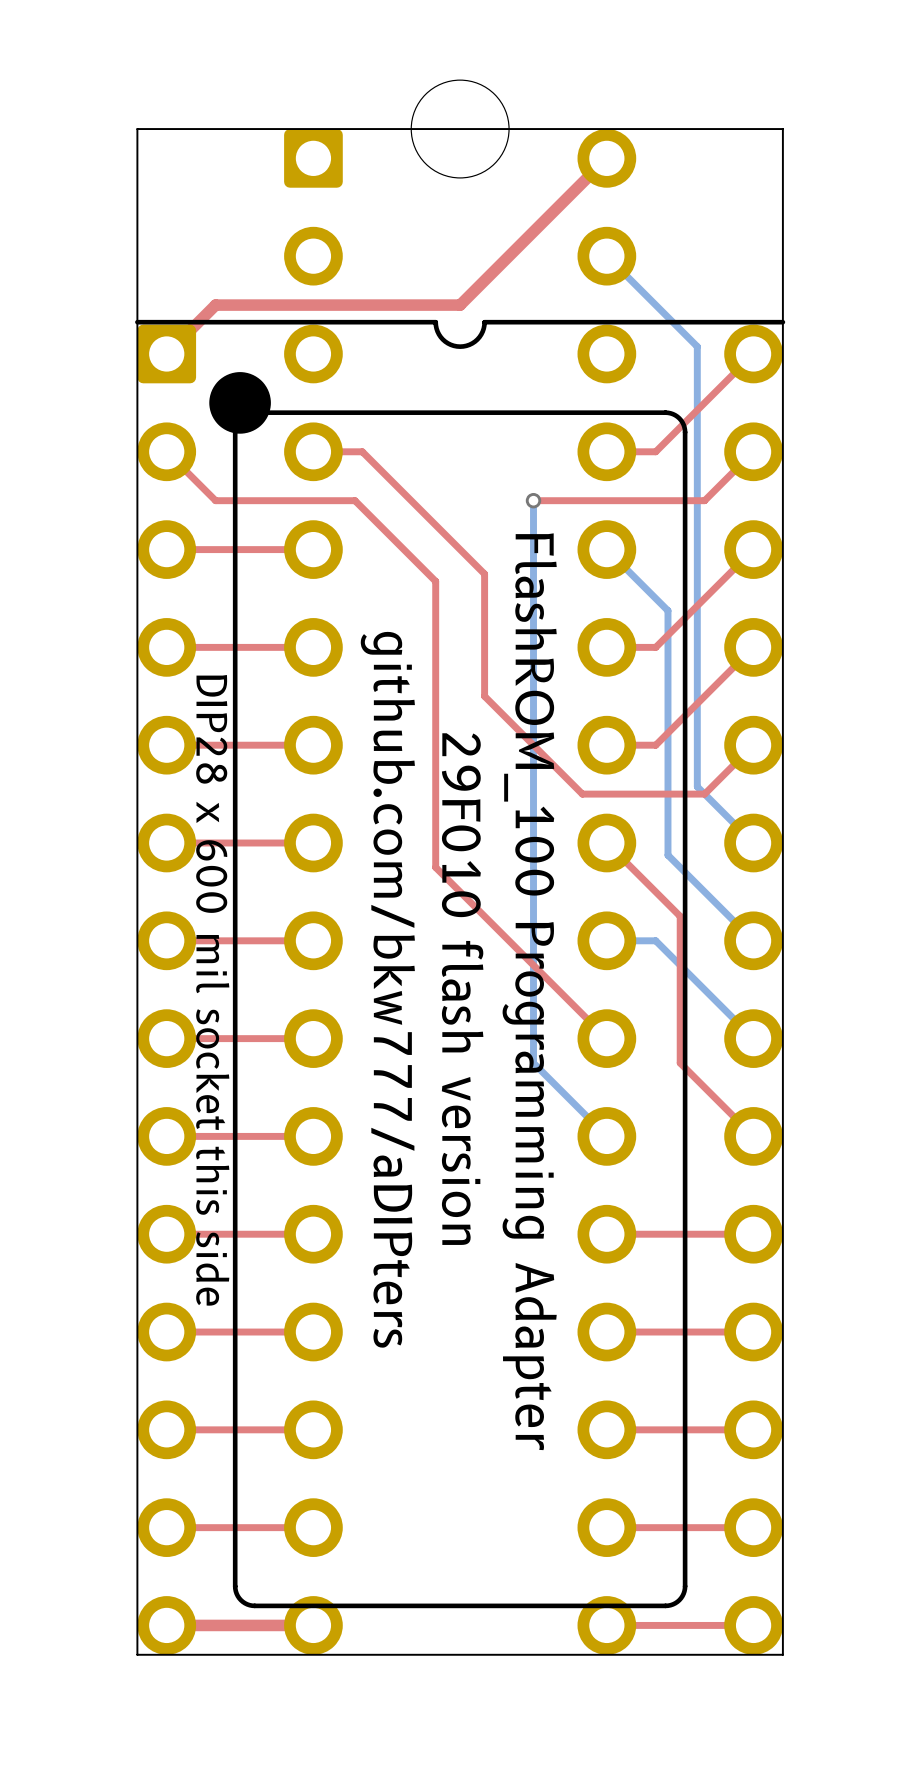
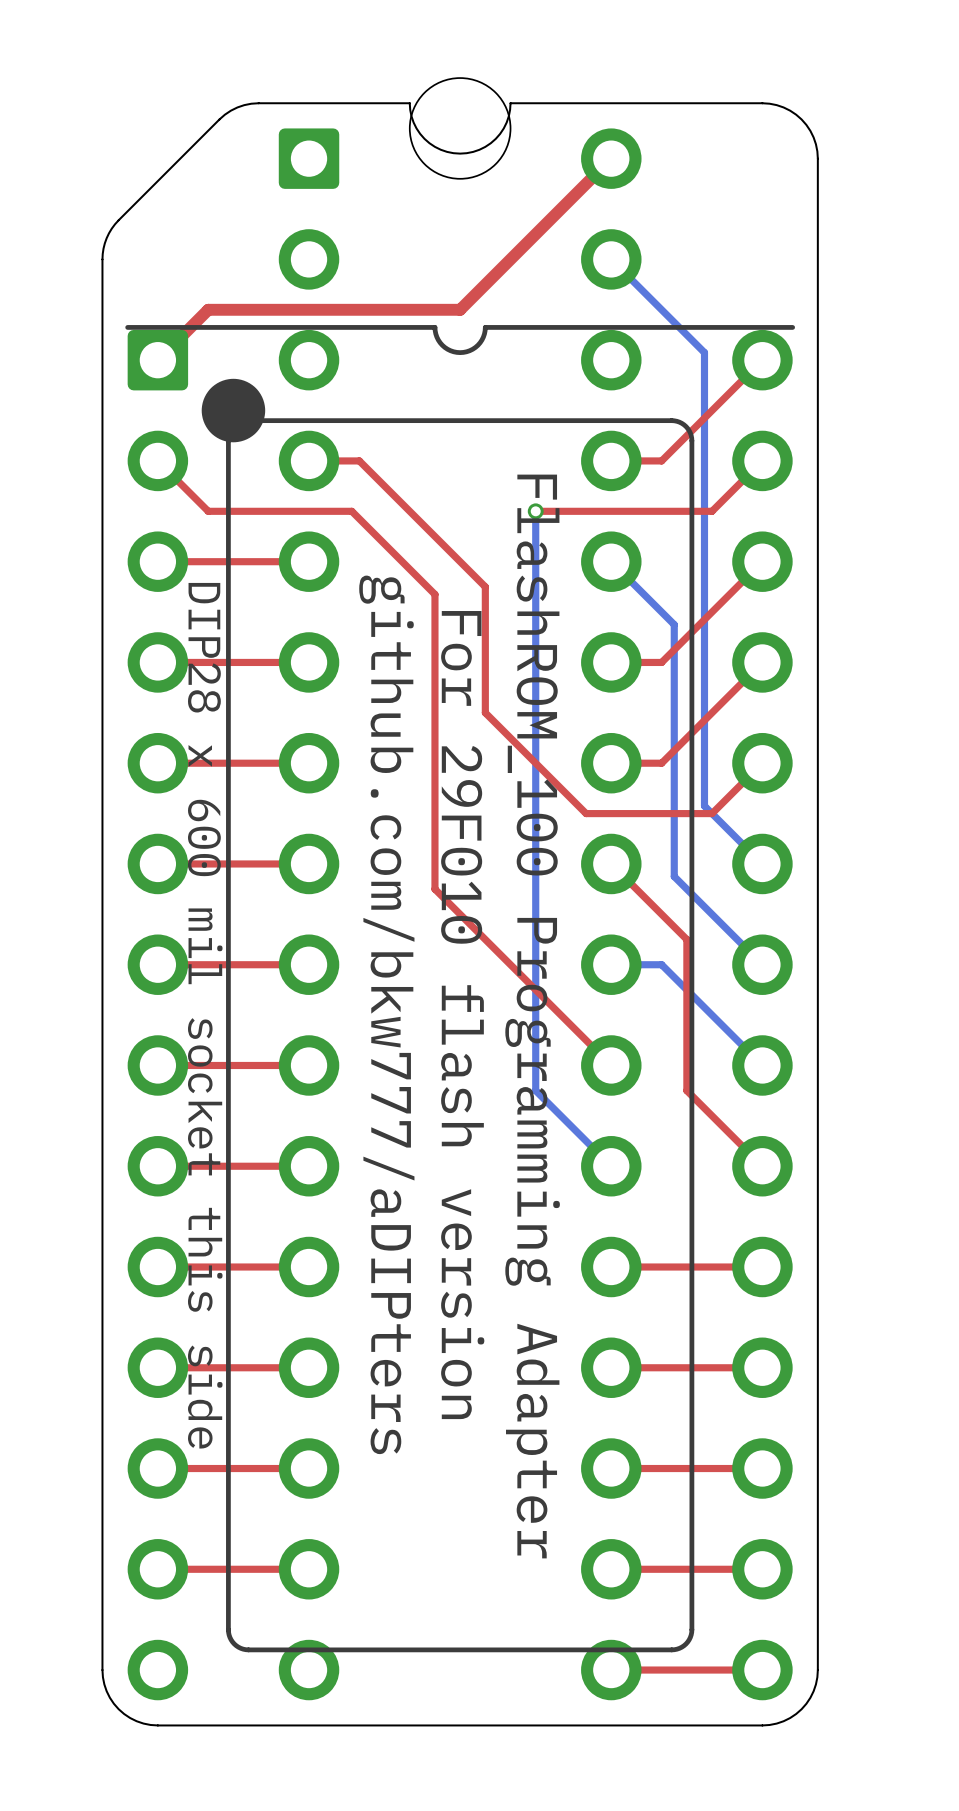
board edge: (137, 129) (137, 1654) (782, 1654) (782, 129) (137, 129) -> (258, 103) (237, 107) (219, 119) (115, 224) (106, 238) (102, 253) (102, 1670) (104, 1684) (113, 1703) (124, 1714) (143, 1723) (157, 1725) (762, 1725) (776, 1723) (790, 1718) (806, 1703) (813, 1691) (817, 1670) (817, 158) (815, 144) (810, 130) (796, 114) (783, 107) (769, 103) (510, 103) (506, 122) (495, 138) (479, 149) (460, 153) (440, 149) (424, 138) (413, 122) (409, 103) (258, 103)
text: 29F010 flash version (462, 989) -> For 29F010 flash version (462, 1015)
top track: (166, 1625) (313, 1625) -> none

